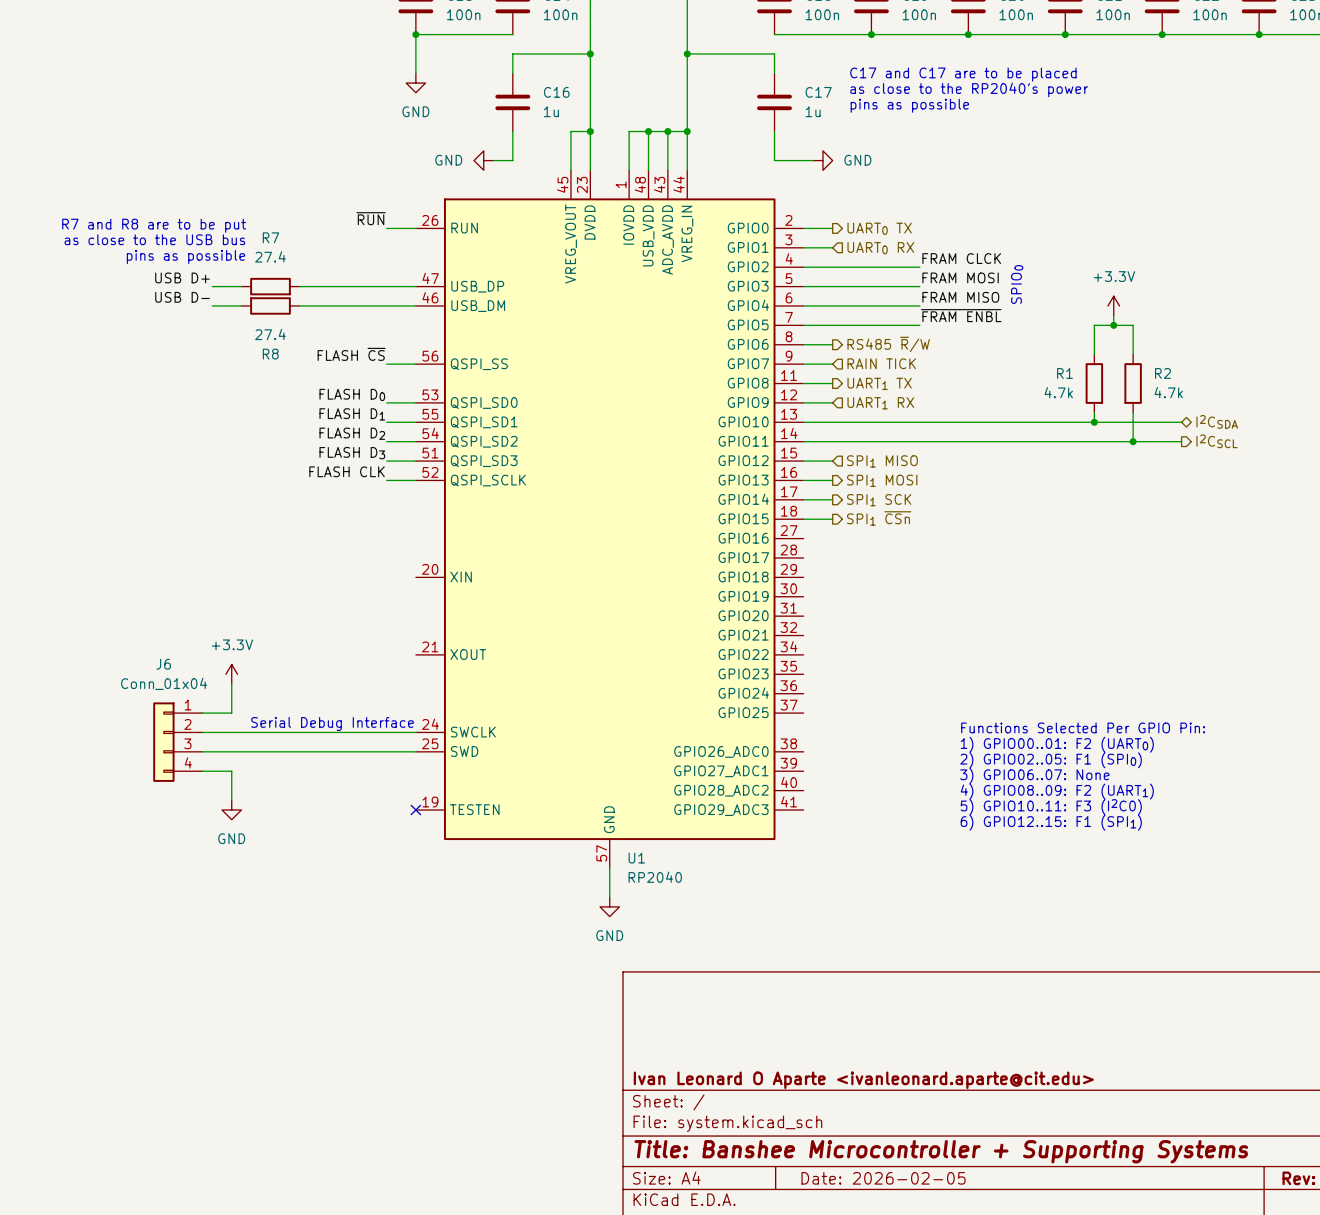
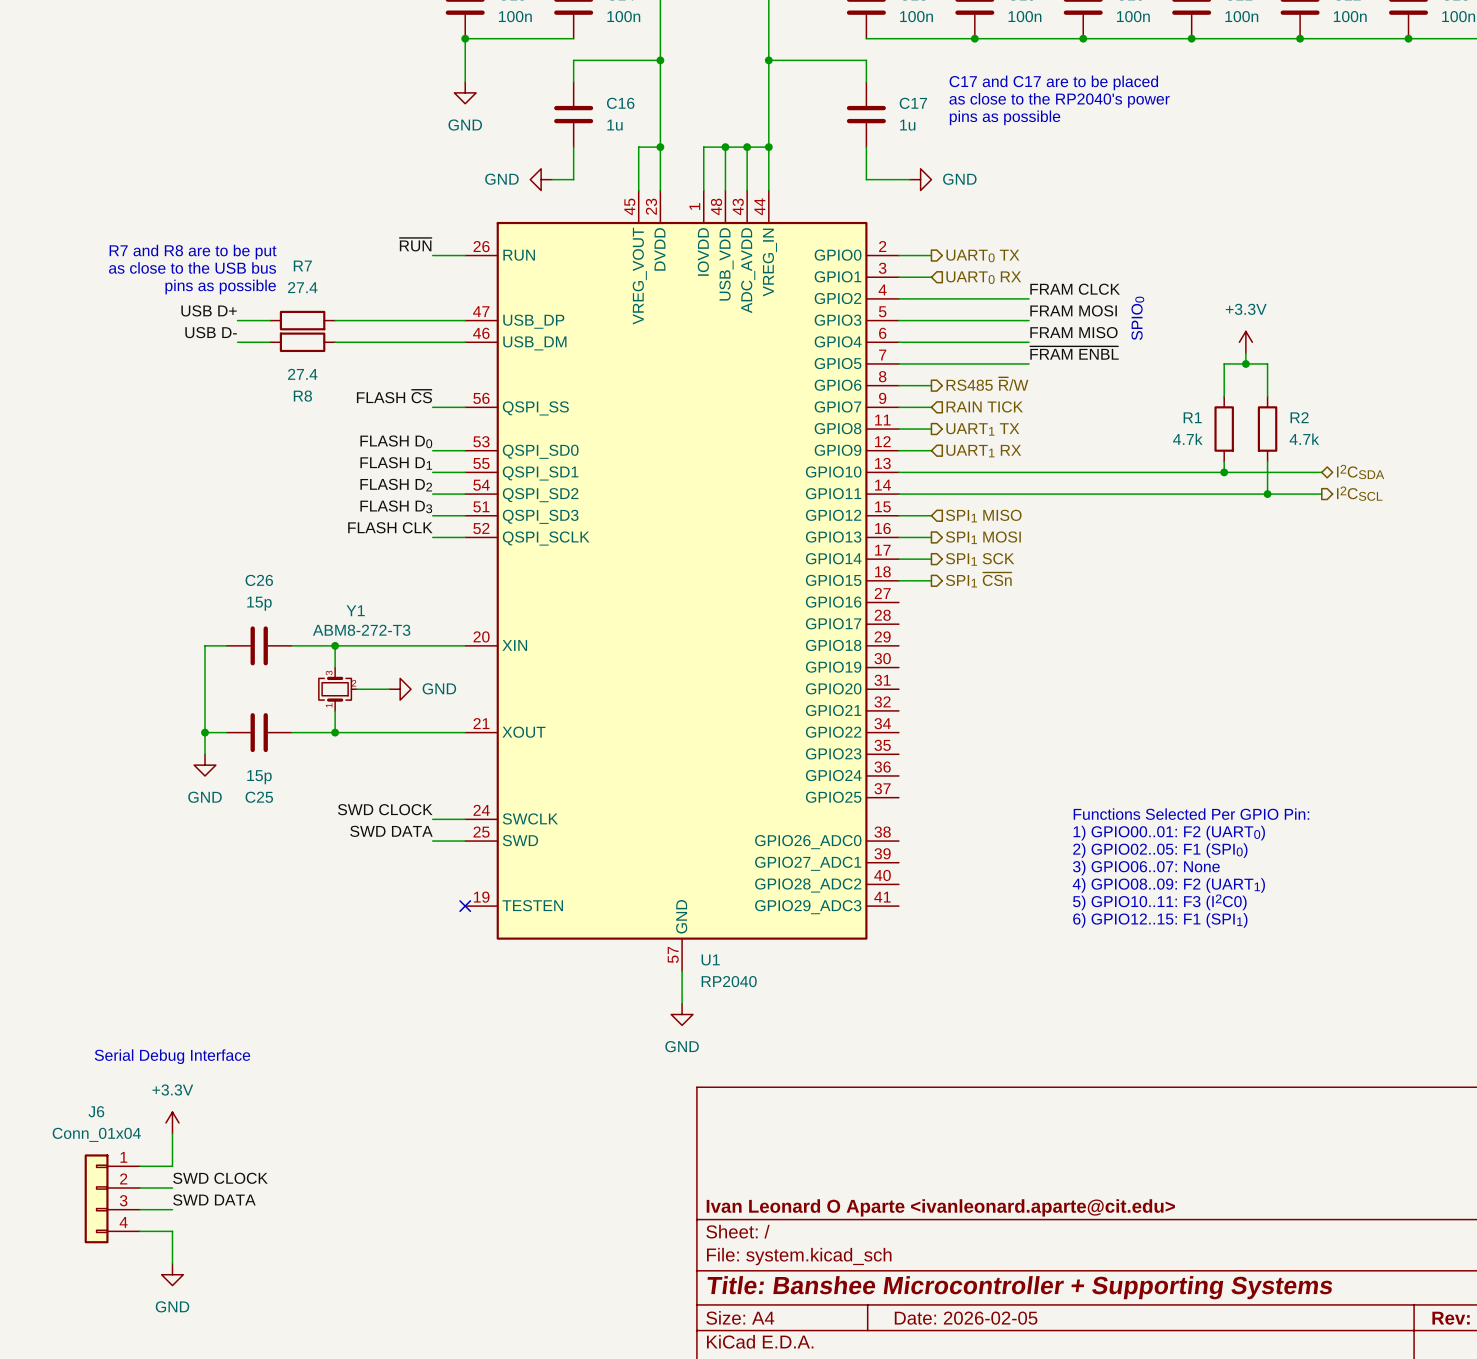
wire: none -> (226, 645) (205, 645) (205, 754)
C26: none -> 15p (259, 645)
wire: none -> (291, 645) (465, 645)
wire: none -> (335, 645) (335, 667)
junction: none -> (335, 645)
Y1: none -> ABM8-272-T3 (337, 689)
wire: none -> (356, 689) (389, 689)
power symbol: none -> GND (400, 689)
wire: none -> (335, 710) (335, 732)
wire: none -> (205, 732) (226, 732)
junction: none -> (205, 732)
C25: none -> 15p (259, 732)
wire: none -> (291, 732) (465, 732)
junction: none -> (335, 732)
power symbol: +3.3V (231, 674) -> none
power symbol: none -> GND (205, 765)
wire: (231, 683) (231, 713) (202, 713) -> none
label: none -> SWD CLOCK (385, 809)
text: Serial Debug Interface (332, 724) -> none
wire: (202, 732) (386, 732) -> none
J6 position: (177, 742) -> (112, 1198)
label: none -> SWD DATA (391, 831)
wire: (202, 751) (386, 751) -> none
wire: (202, 771) (231, 771) (231, 800) -> none
power symbol: GND (231, 809) -> none
text: none -> Serial Debug Interface (172, 1056)
power symbol: none -> +3.3V (172, 1122)
wire: none -> (172, 1133) (172, 1166) (139, 1166)
label: none -> SWD CLOCK (220, 1178)
wire: none -> (139, 1187) (172, 1187)
label: none -> SWD DATA (214, 1200)
wire: none -> (139, 1209) (172, 1209)
wire: none -> (139, 1231) (172, 1231) (172, 1263)
power symbol: none -> GND (172, 1274)

